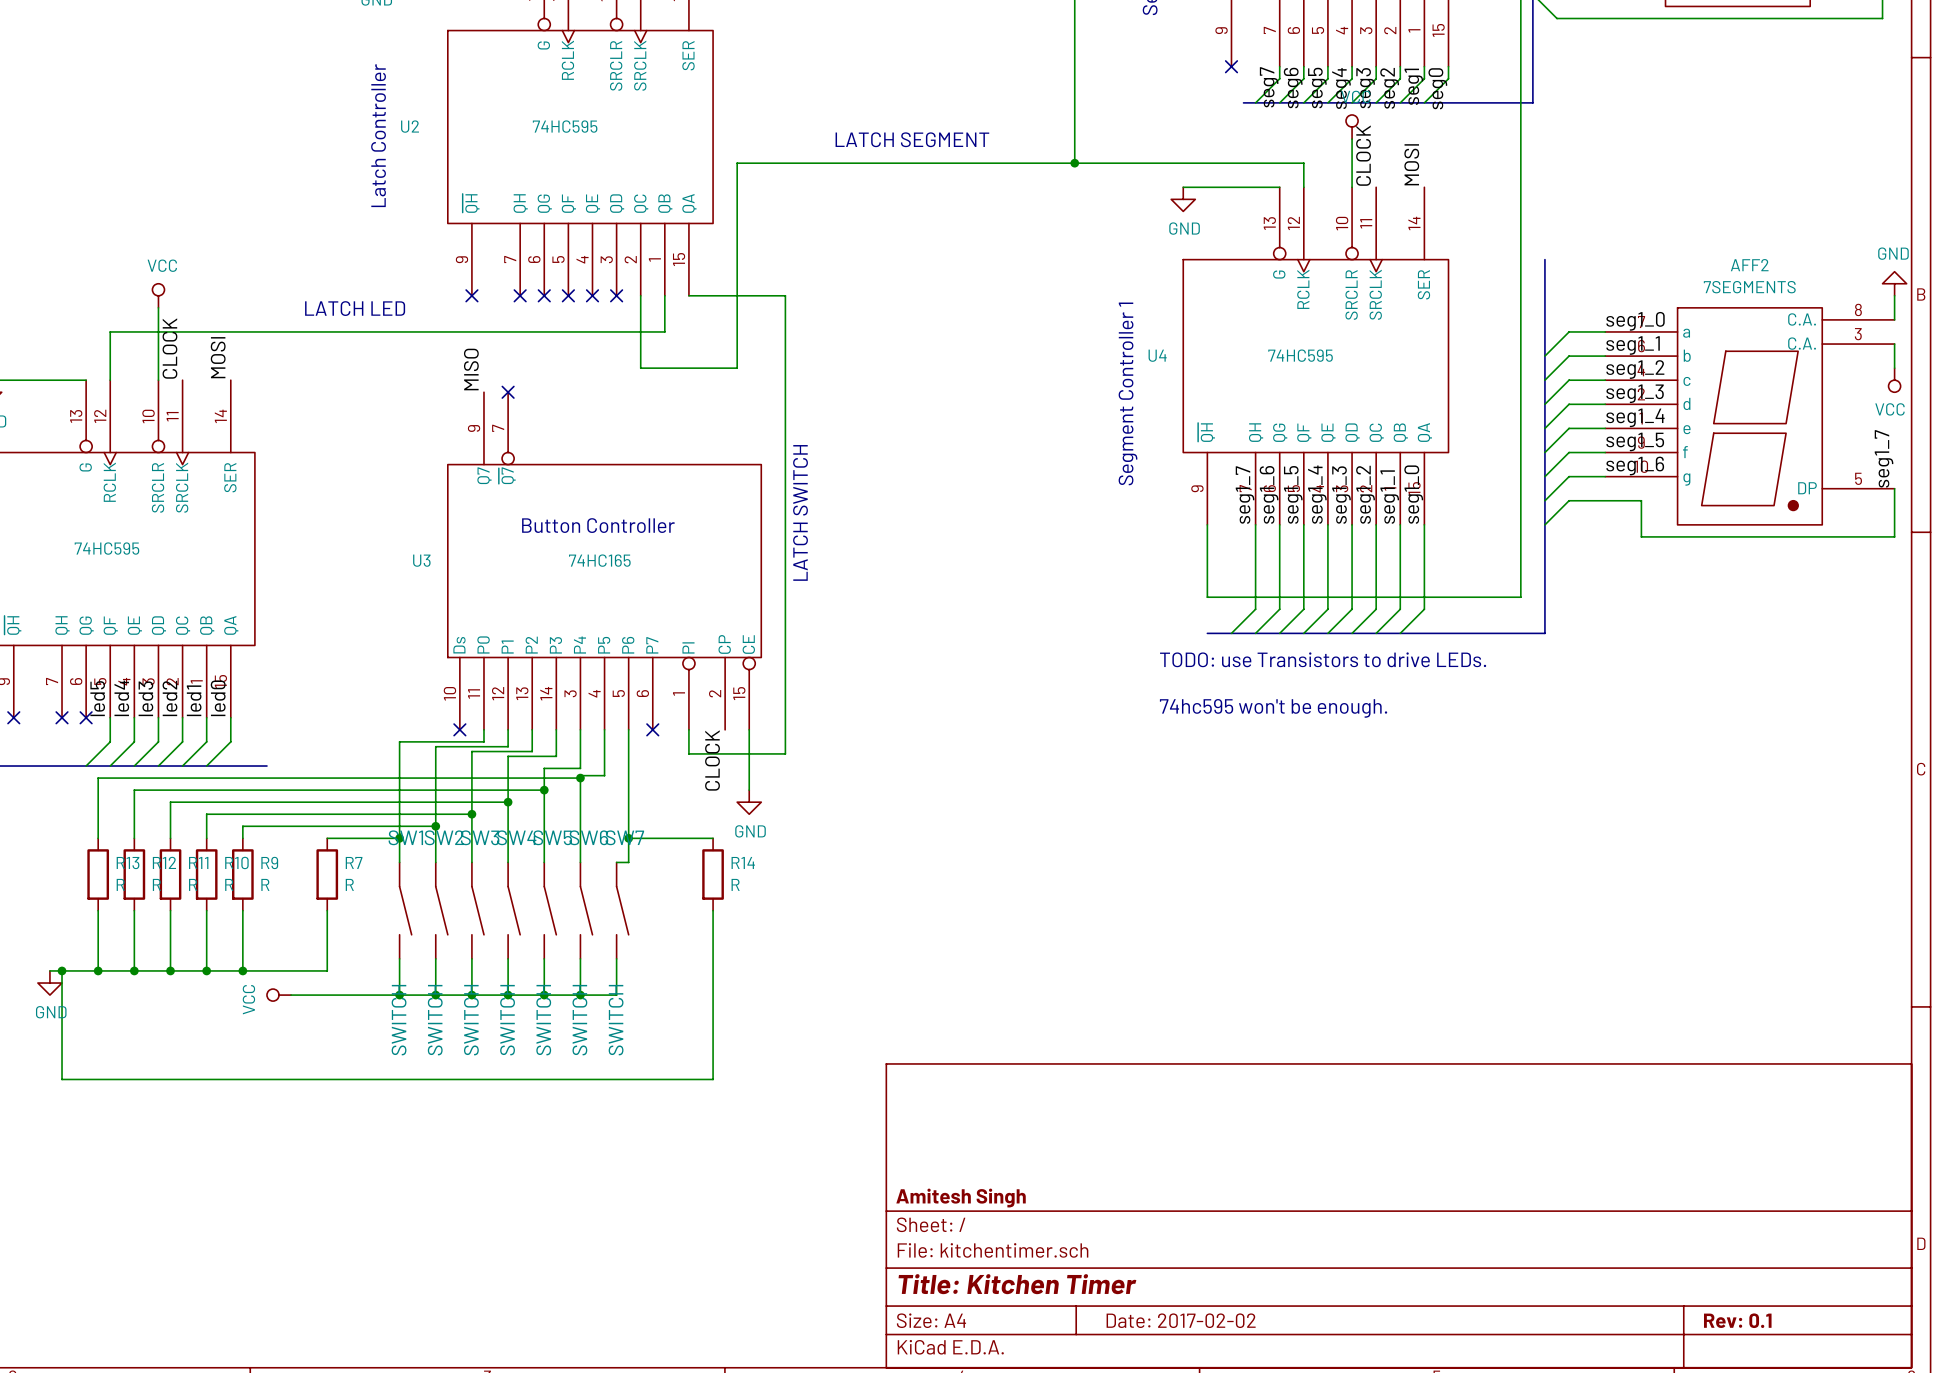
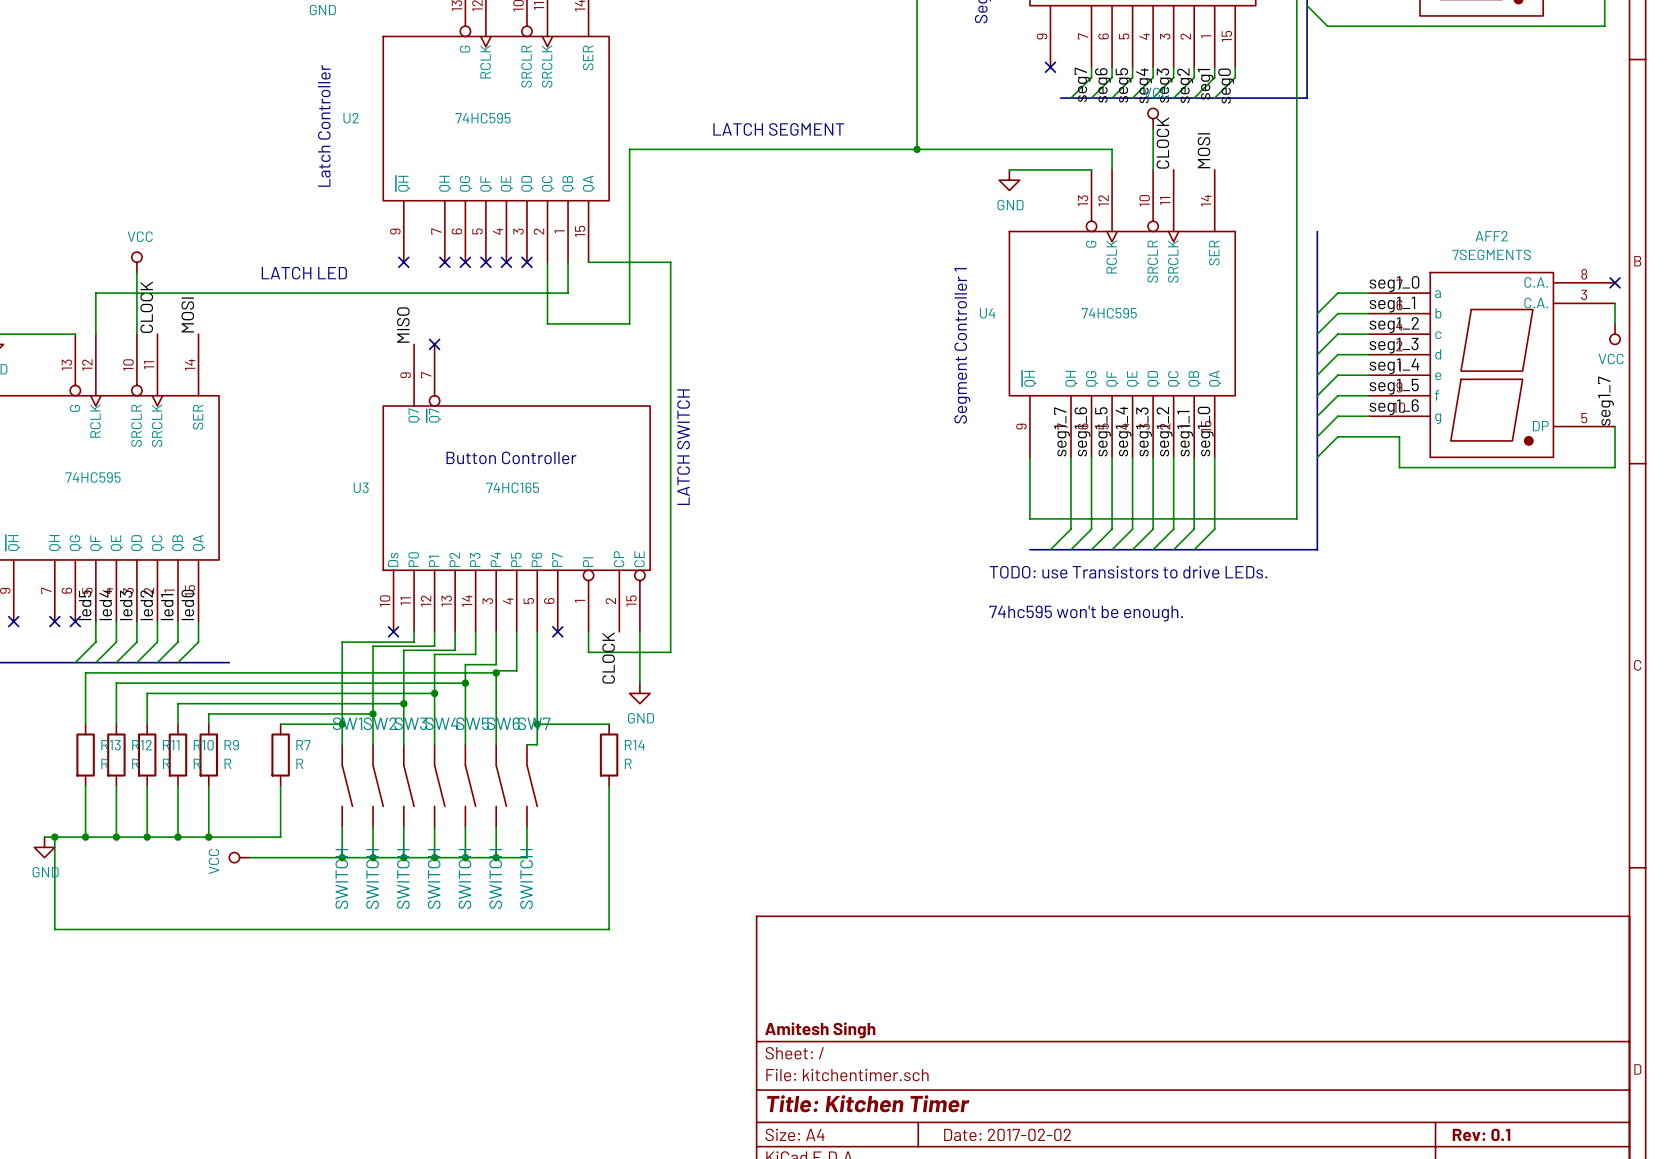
power symbol: GND (1894, 283) -> none
wire: (1894, 295) (1894, 319) -> none
no-connect mark: none -> (1615, 282)

